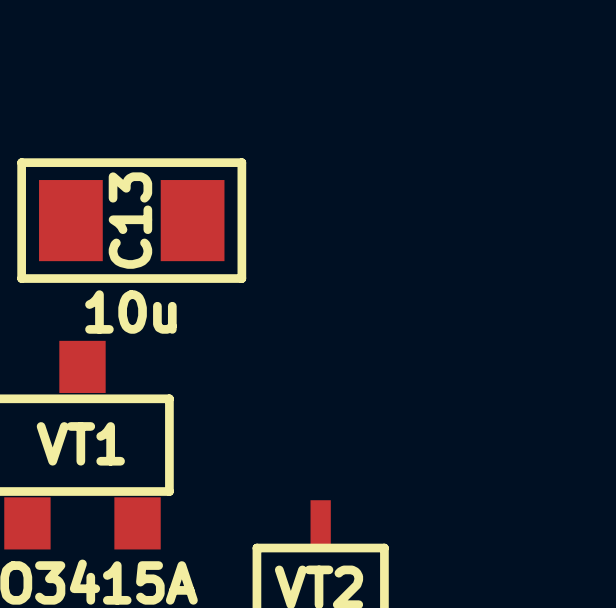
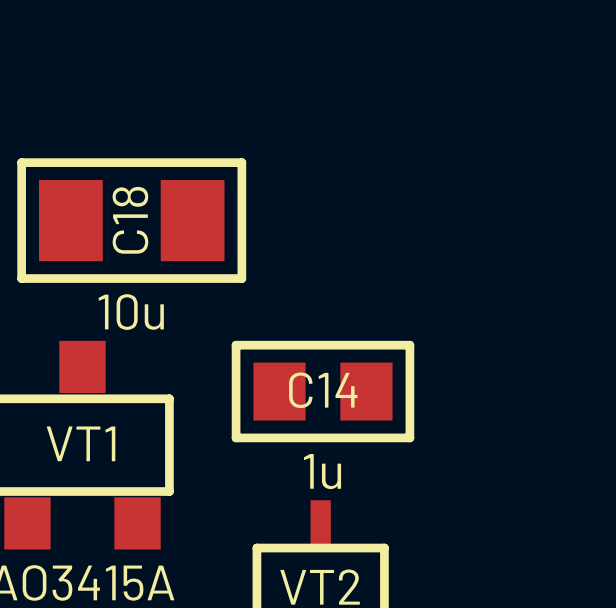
C13 name: C13 (130, 220) -> C18 (130, 220)
C14: none -> 1u (322, 391)

